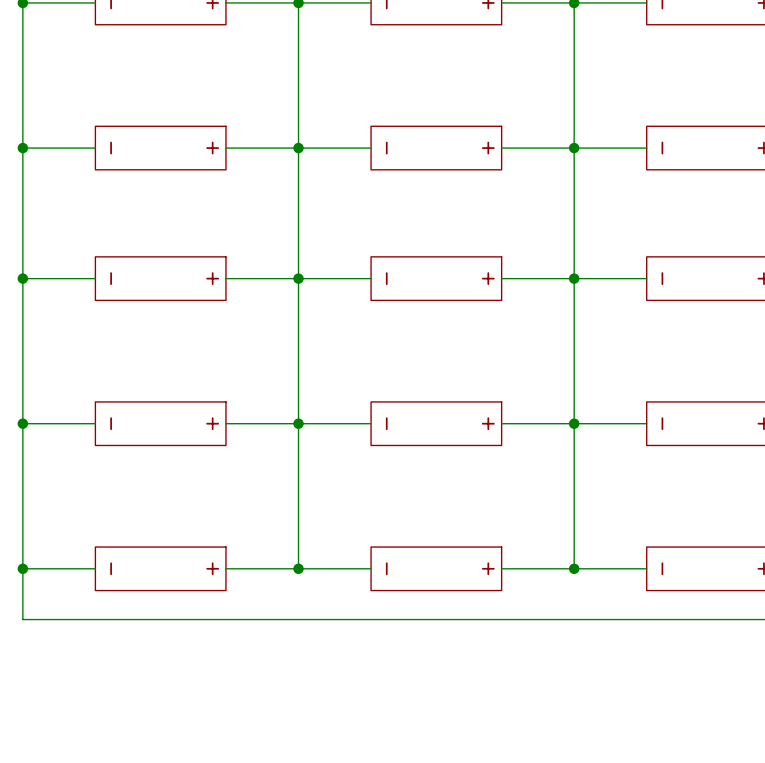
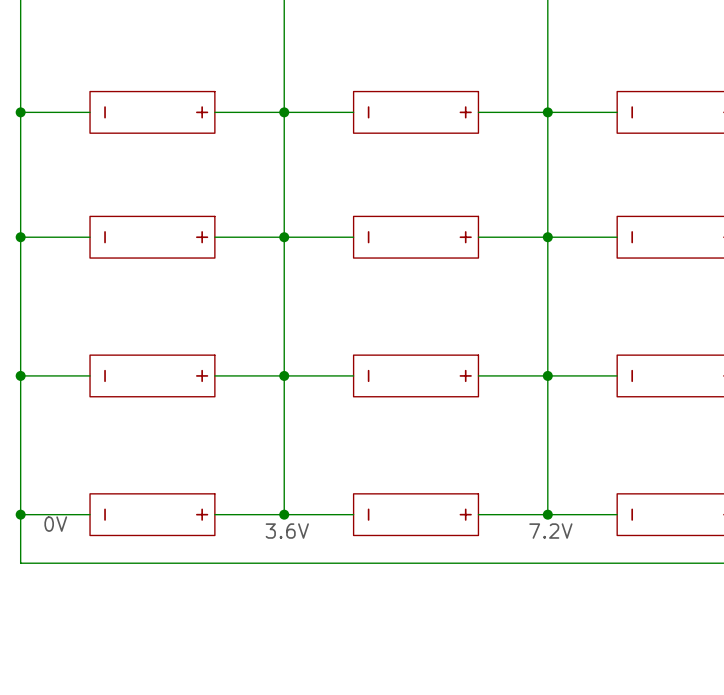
text: none -> 0V (55, 524)
text: none -> 3.6V (287, 531)
text: none -> 7.2V (550, 531)

